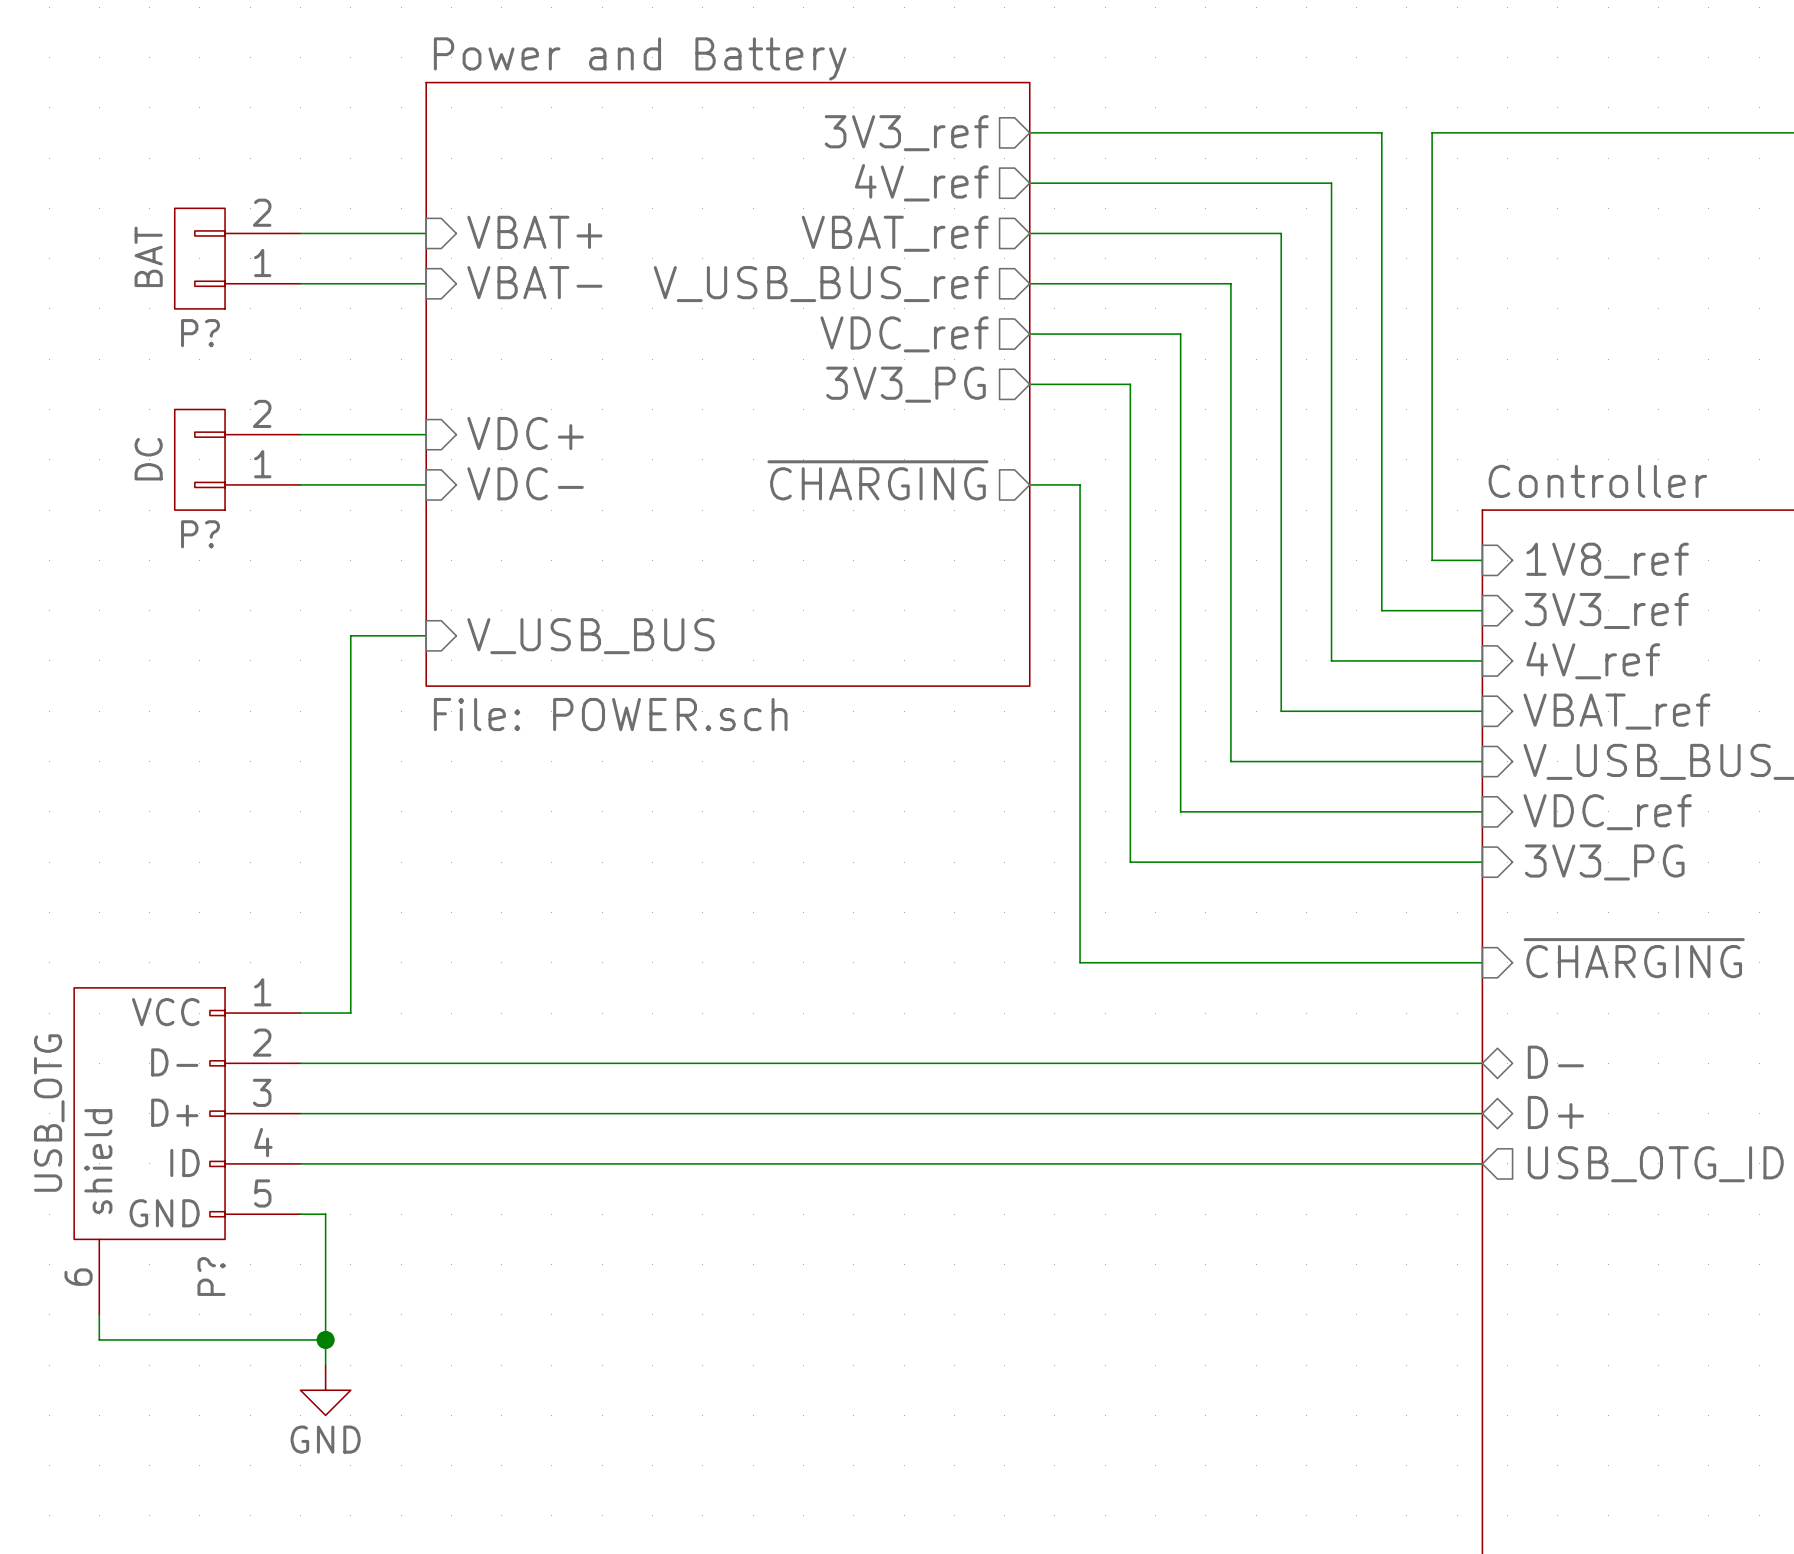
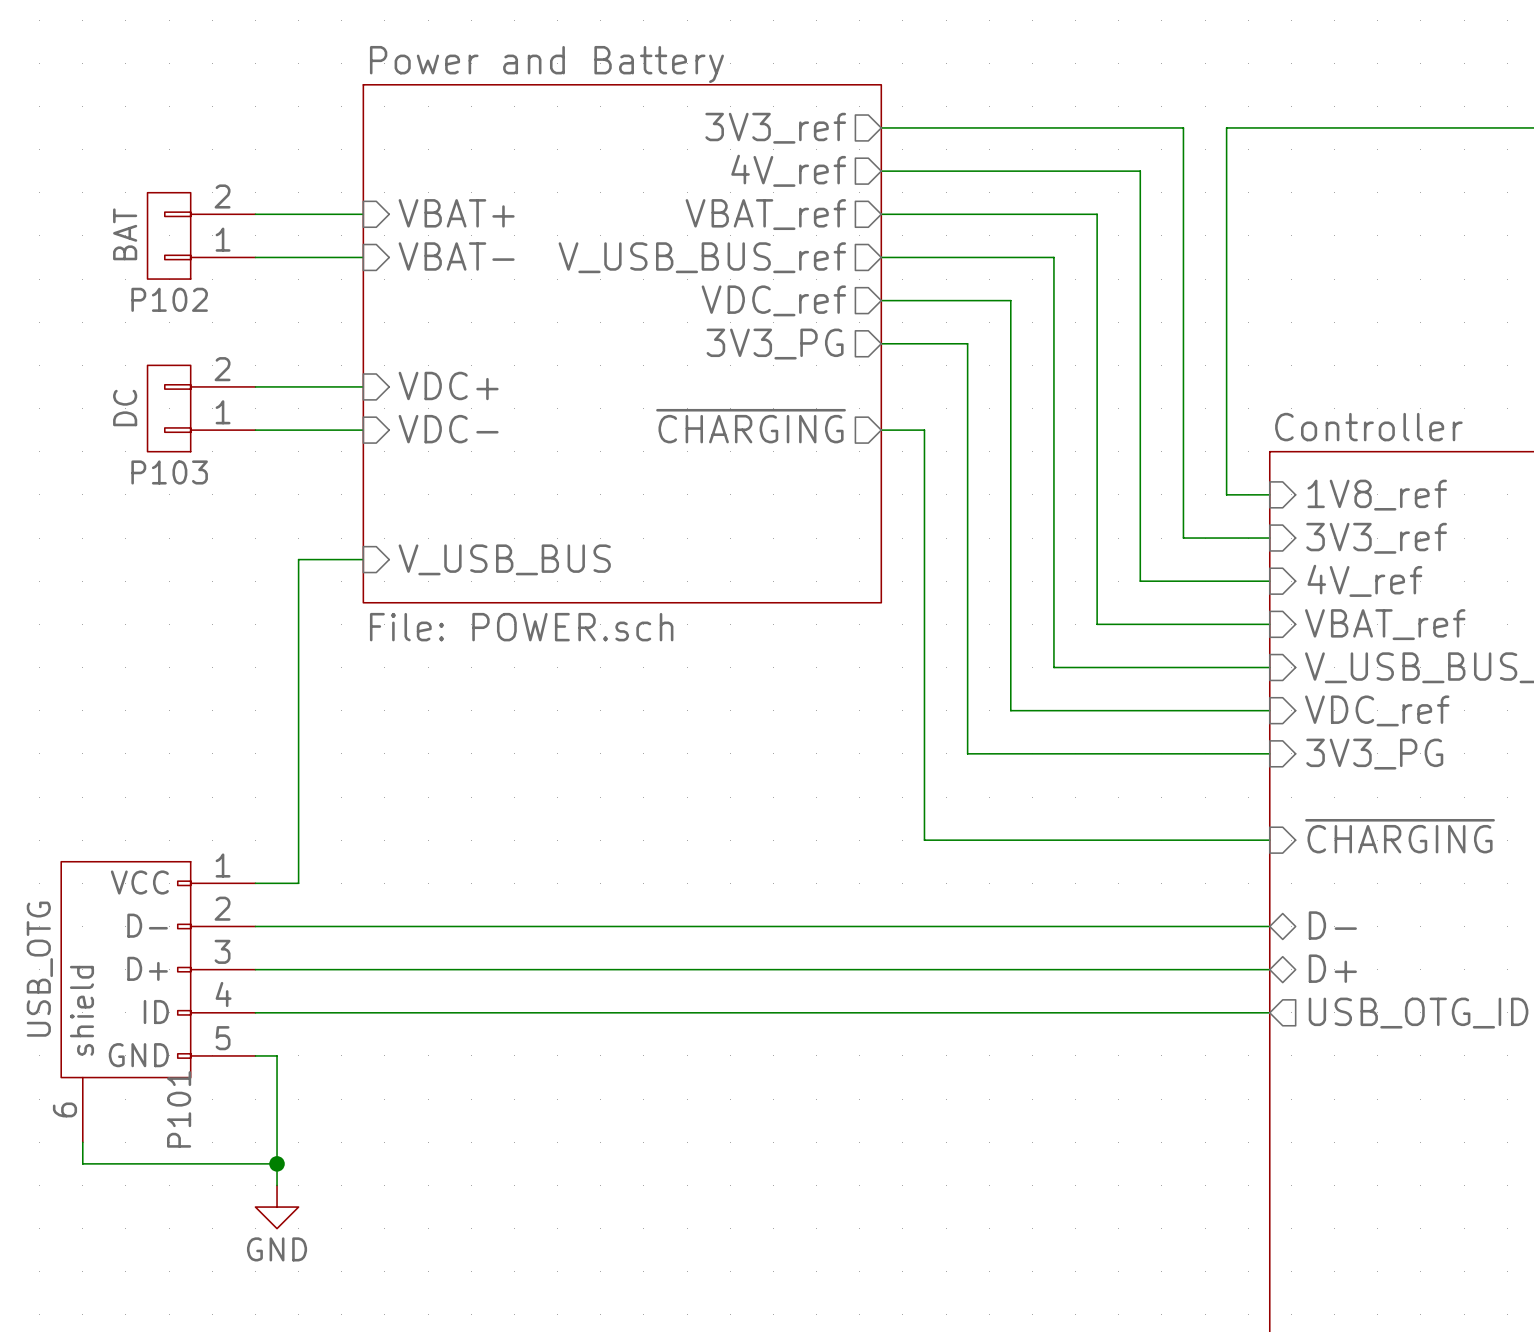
P? name: P? (200, 333) -> P102 (169, 299)
P? name: P? (200, 534) -> P103 (169, 472)
P? name: P? (211, 1276) -> P101 (179, 1109)

